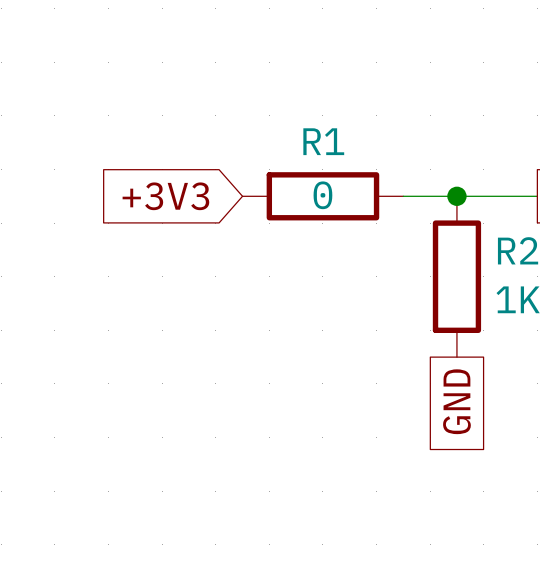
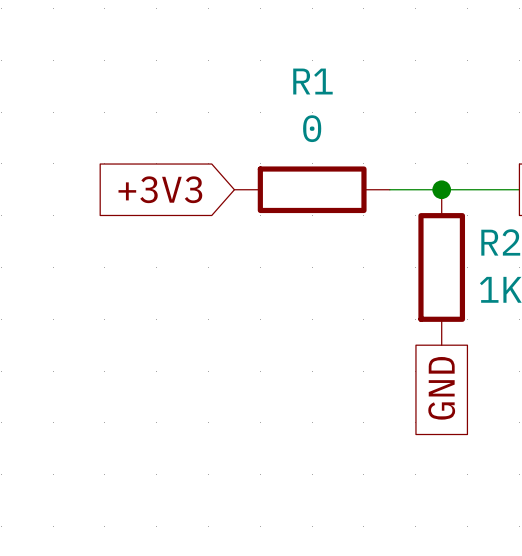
R1 name position: R1 (323, 141) -> R1 (312, 81)
R1 value position: 0 (322, 195) -> 0 (312, 128)

